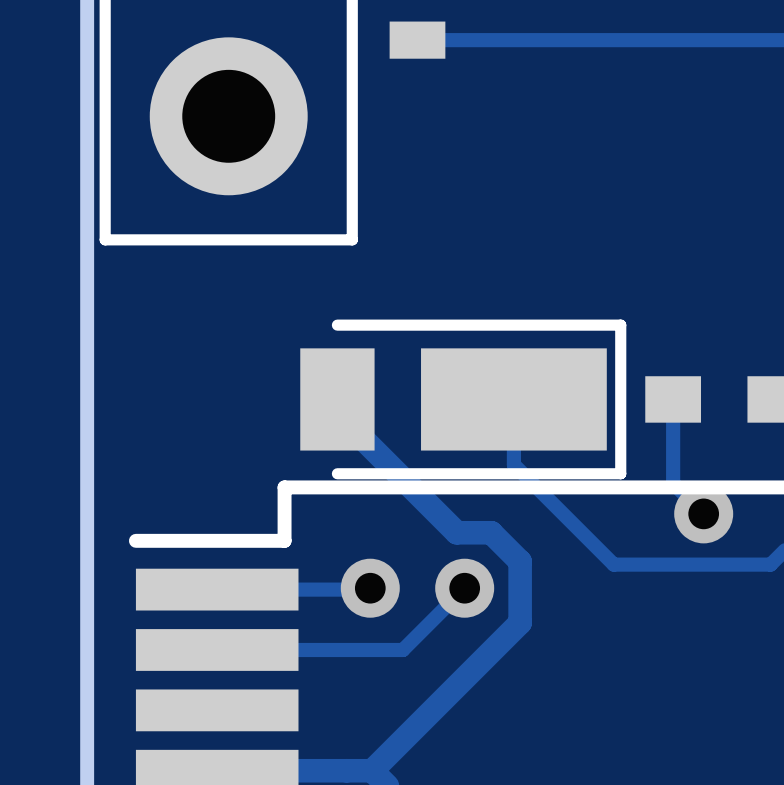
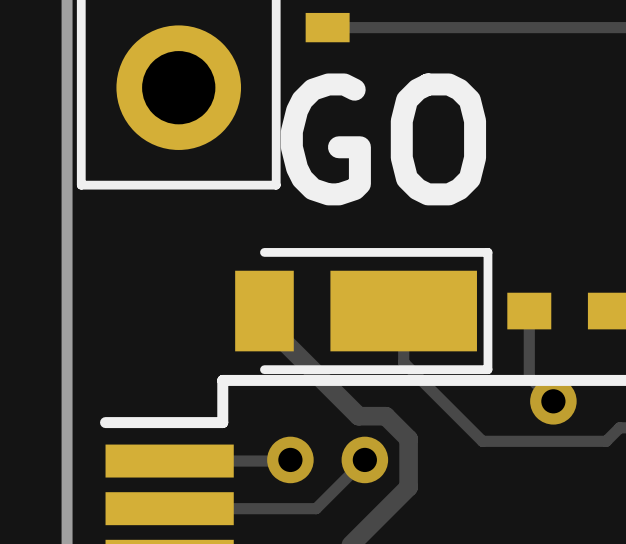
text: none -> GO (383, 139)

